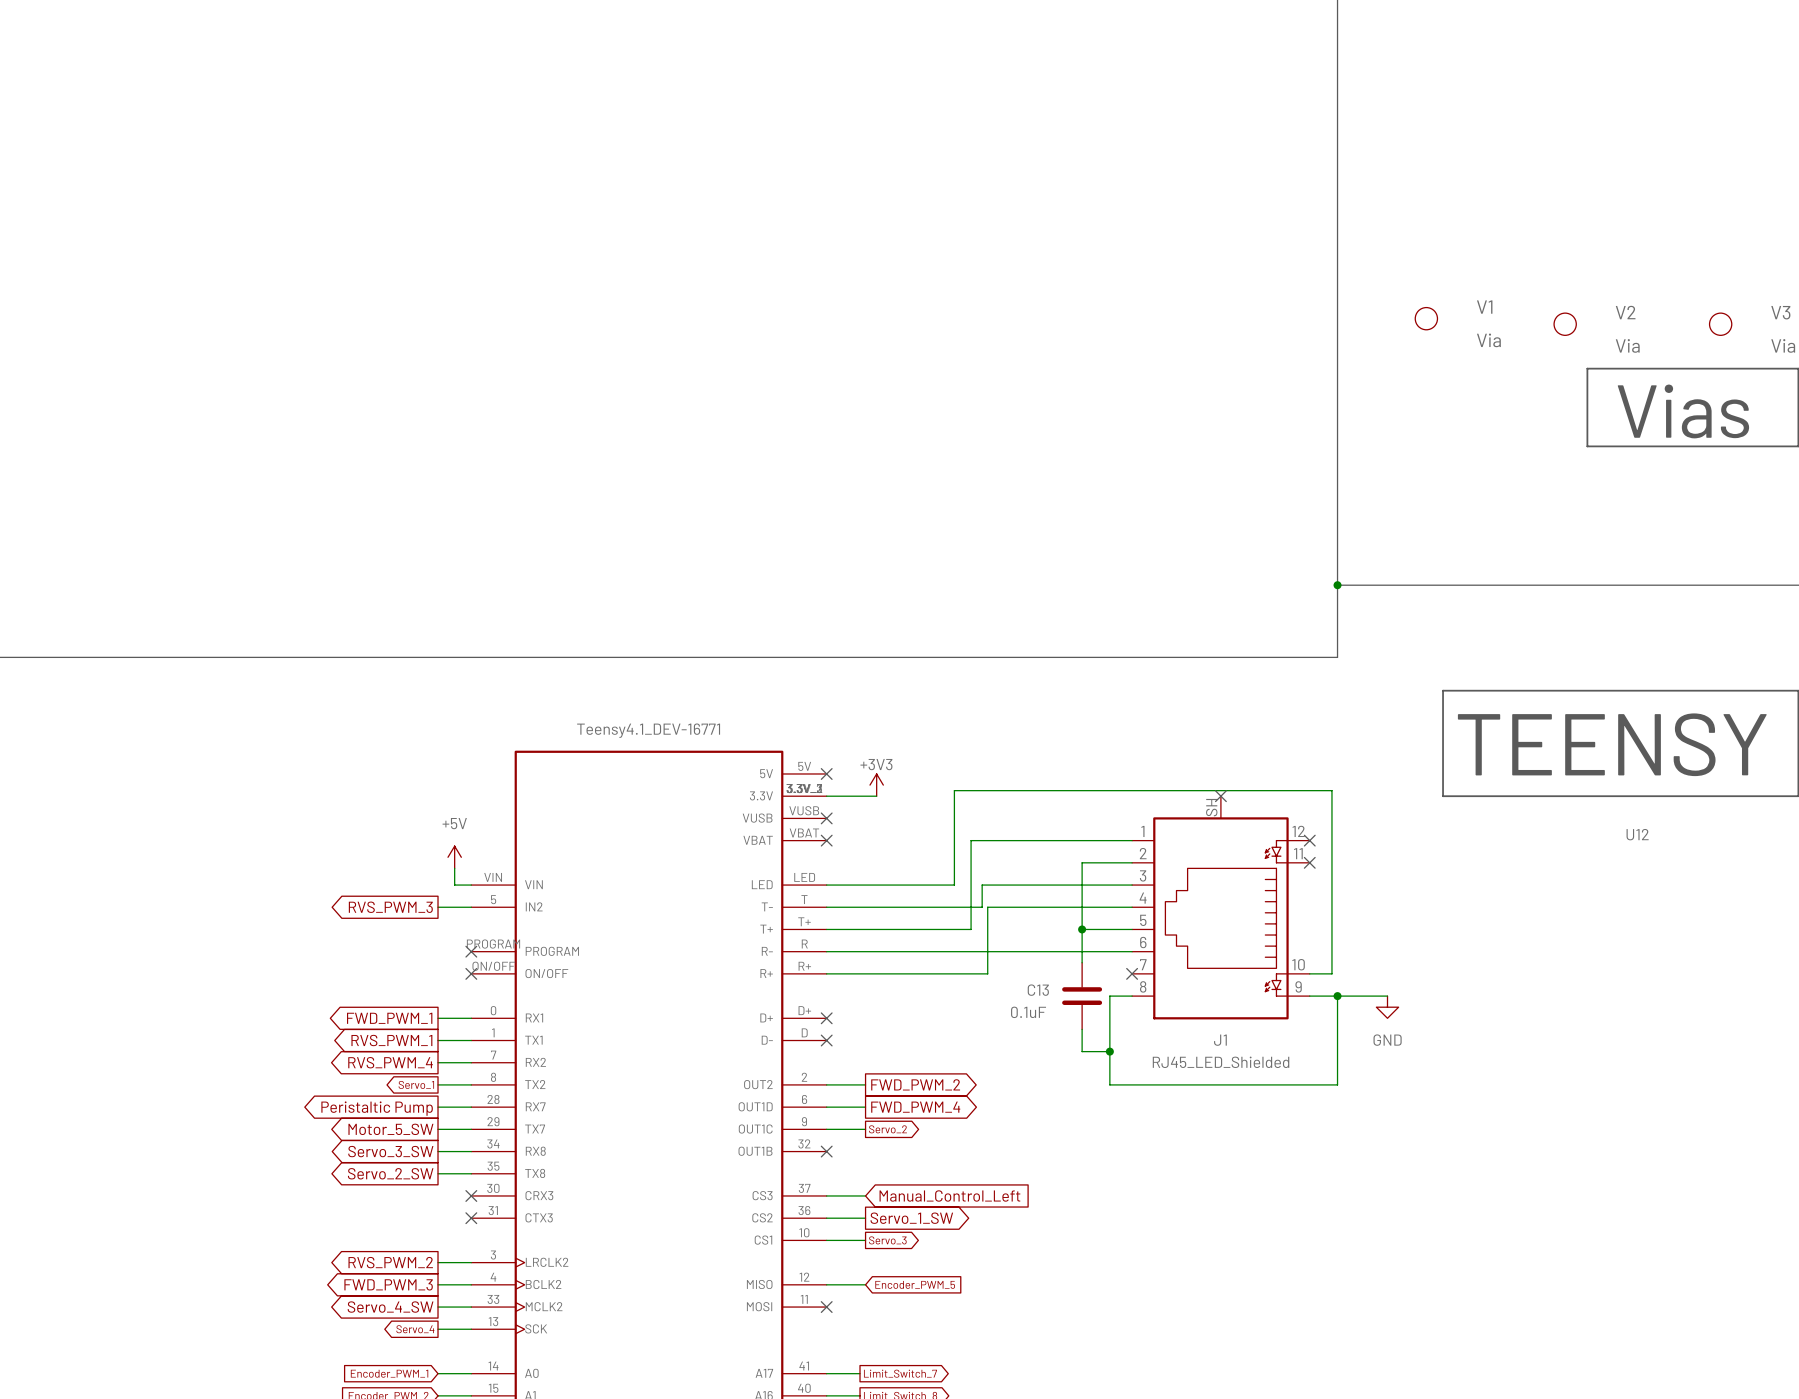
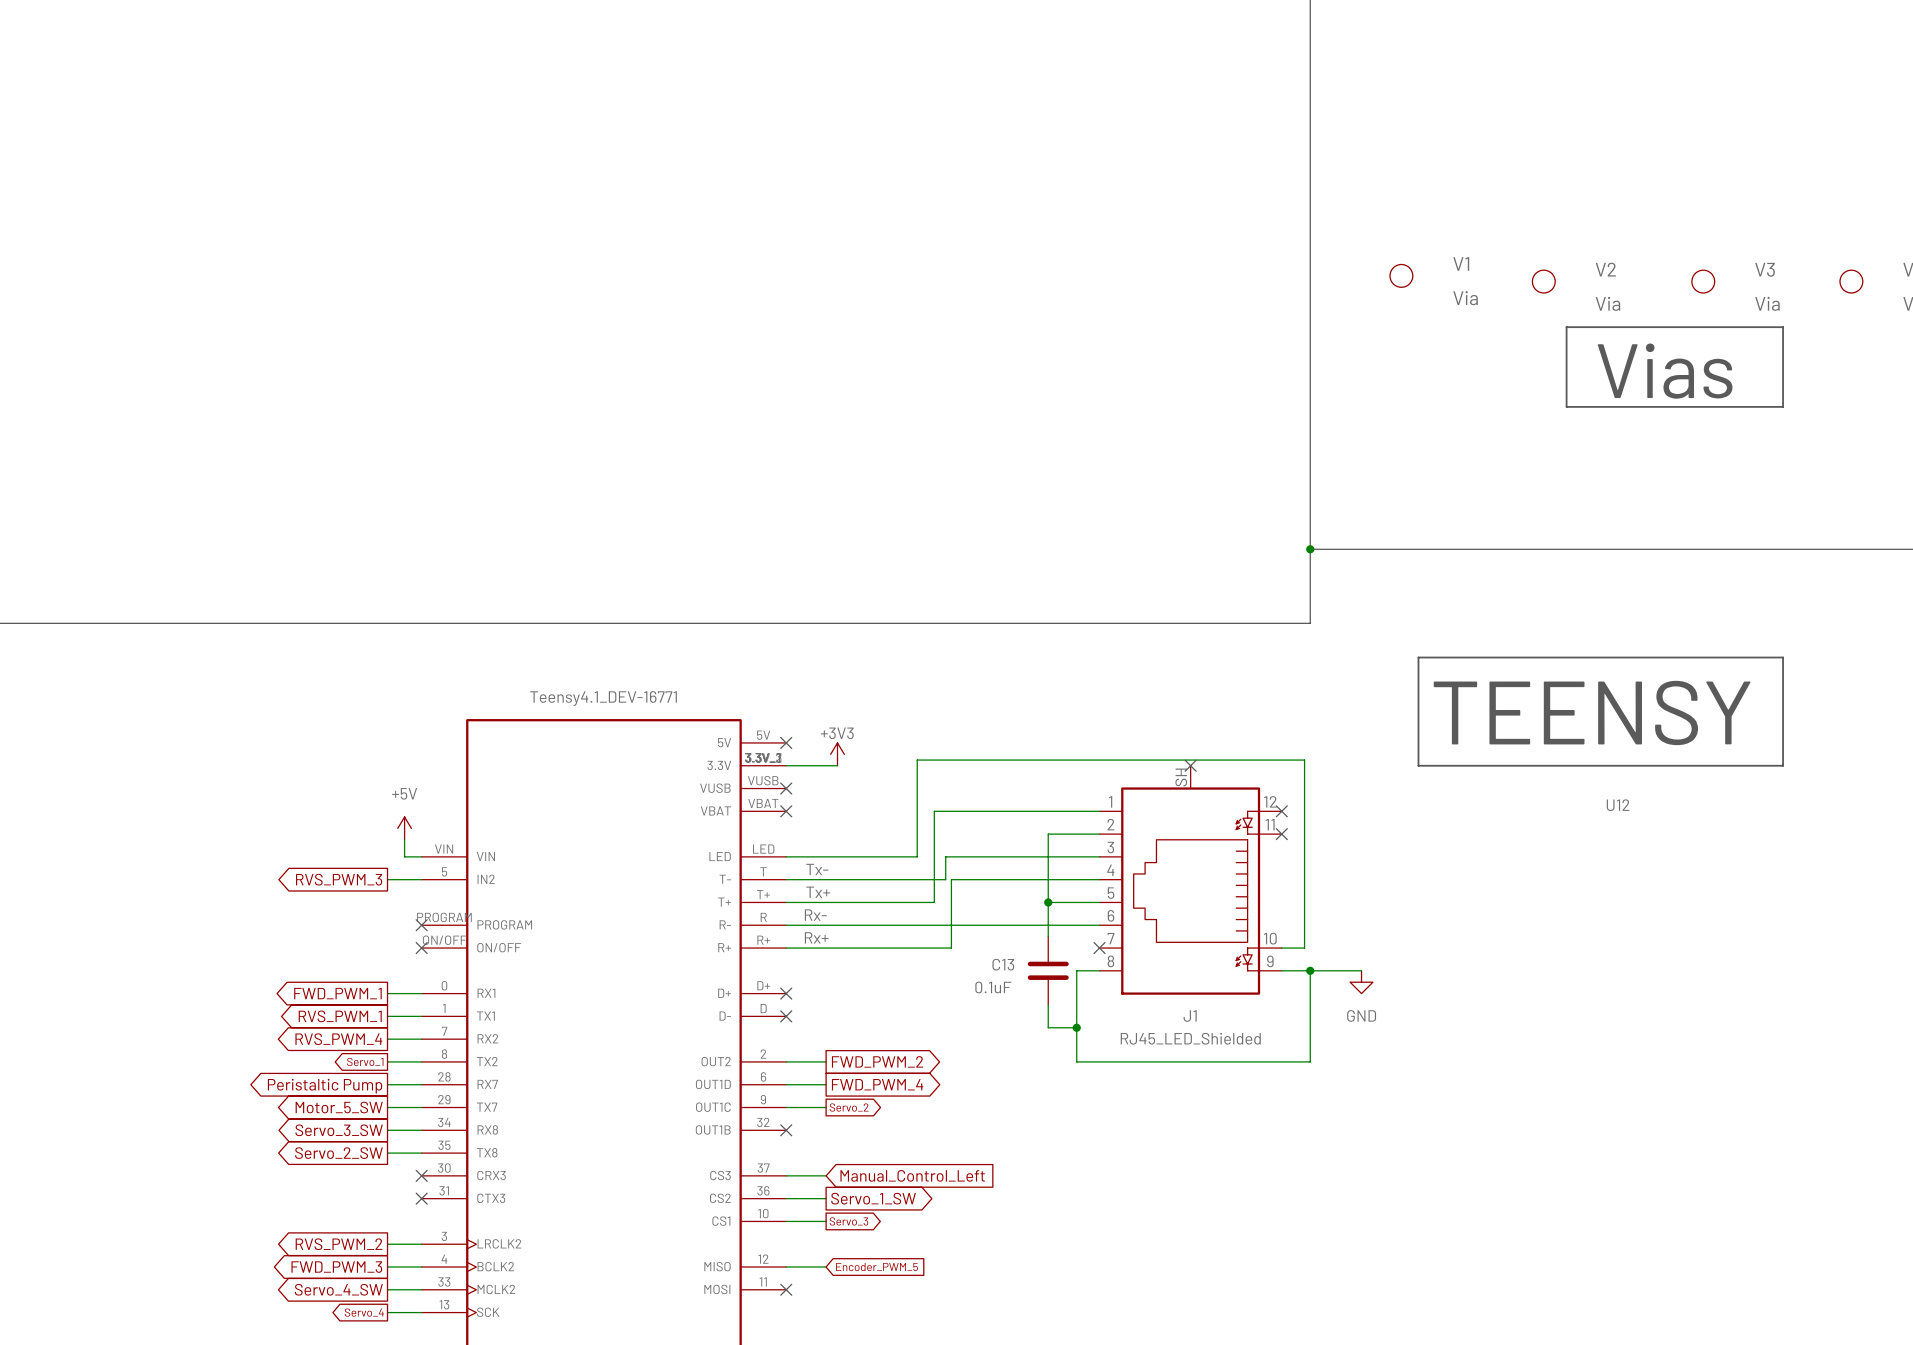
label: none -> Tx- (817, 869)
label: none -> Tx+ (818, 892)
label: none -> Rx- (815, 915)
label: none -> Rx+ (816, 937)

